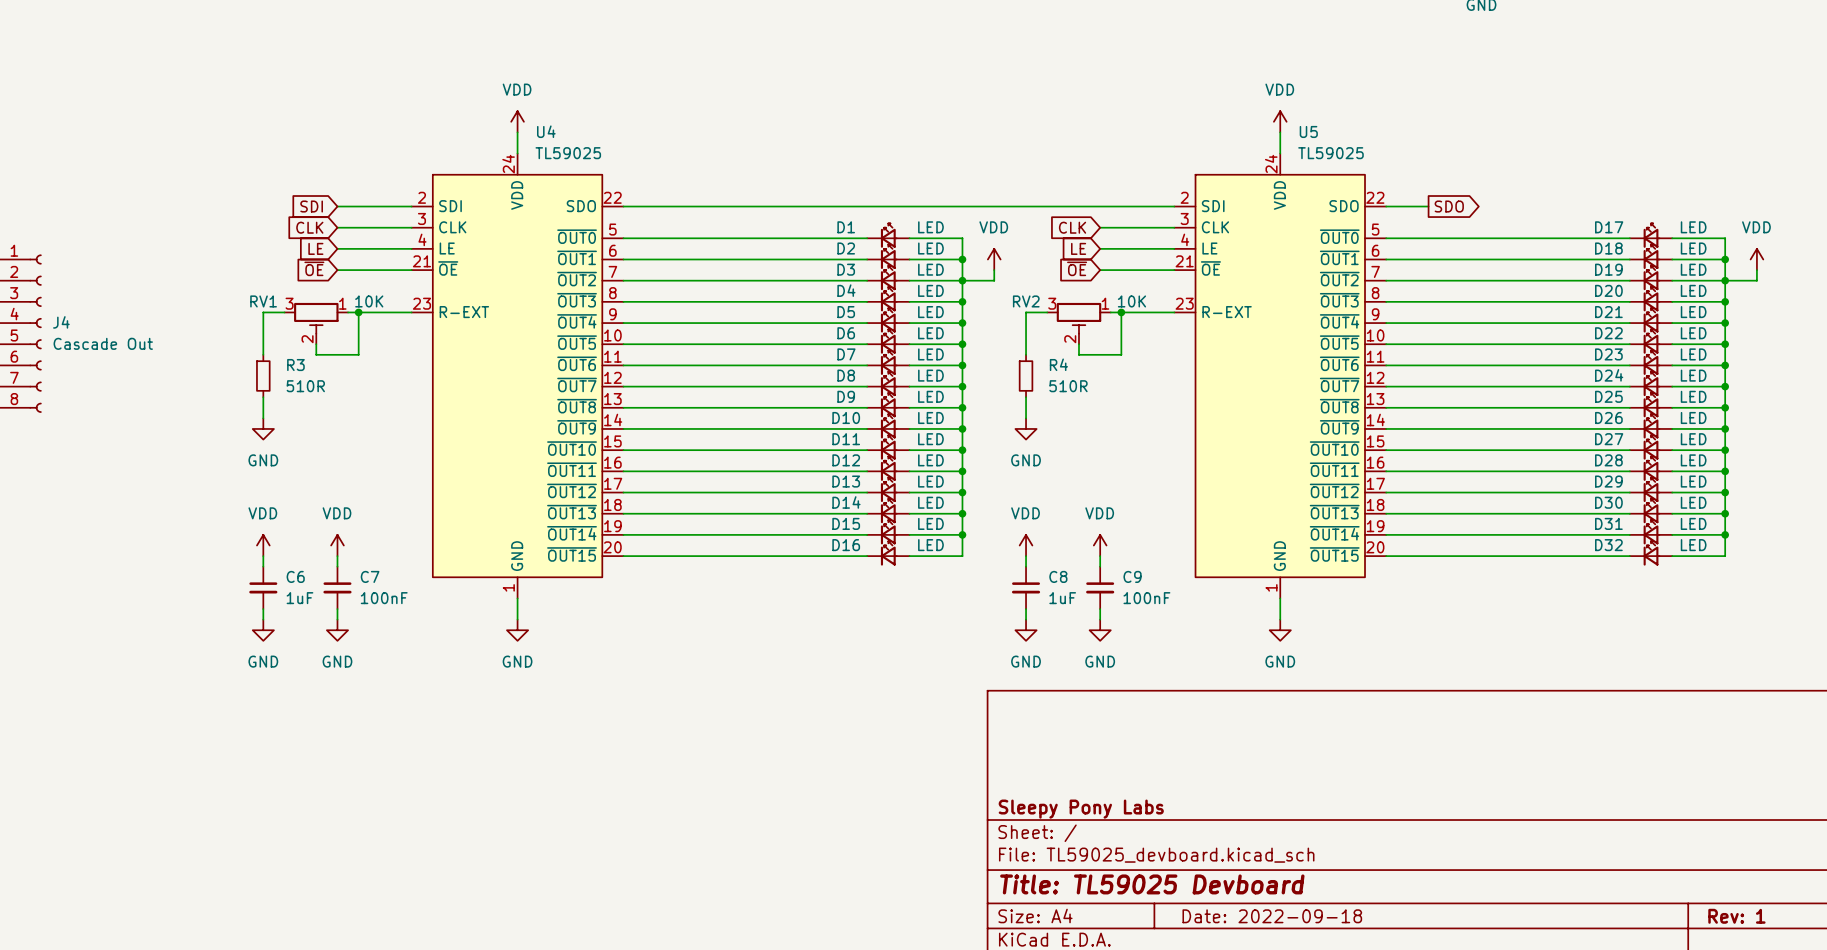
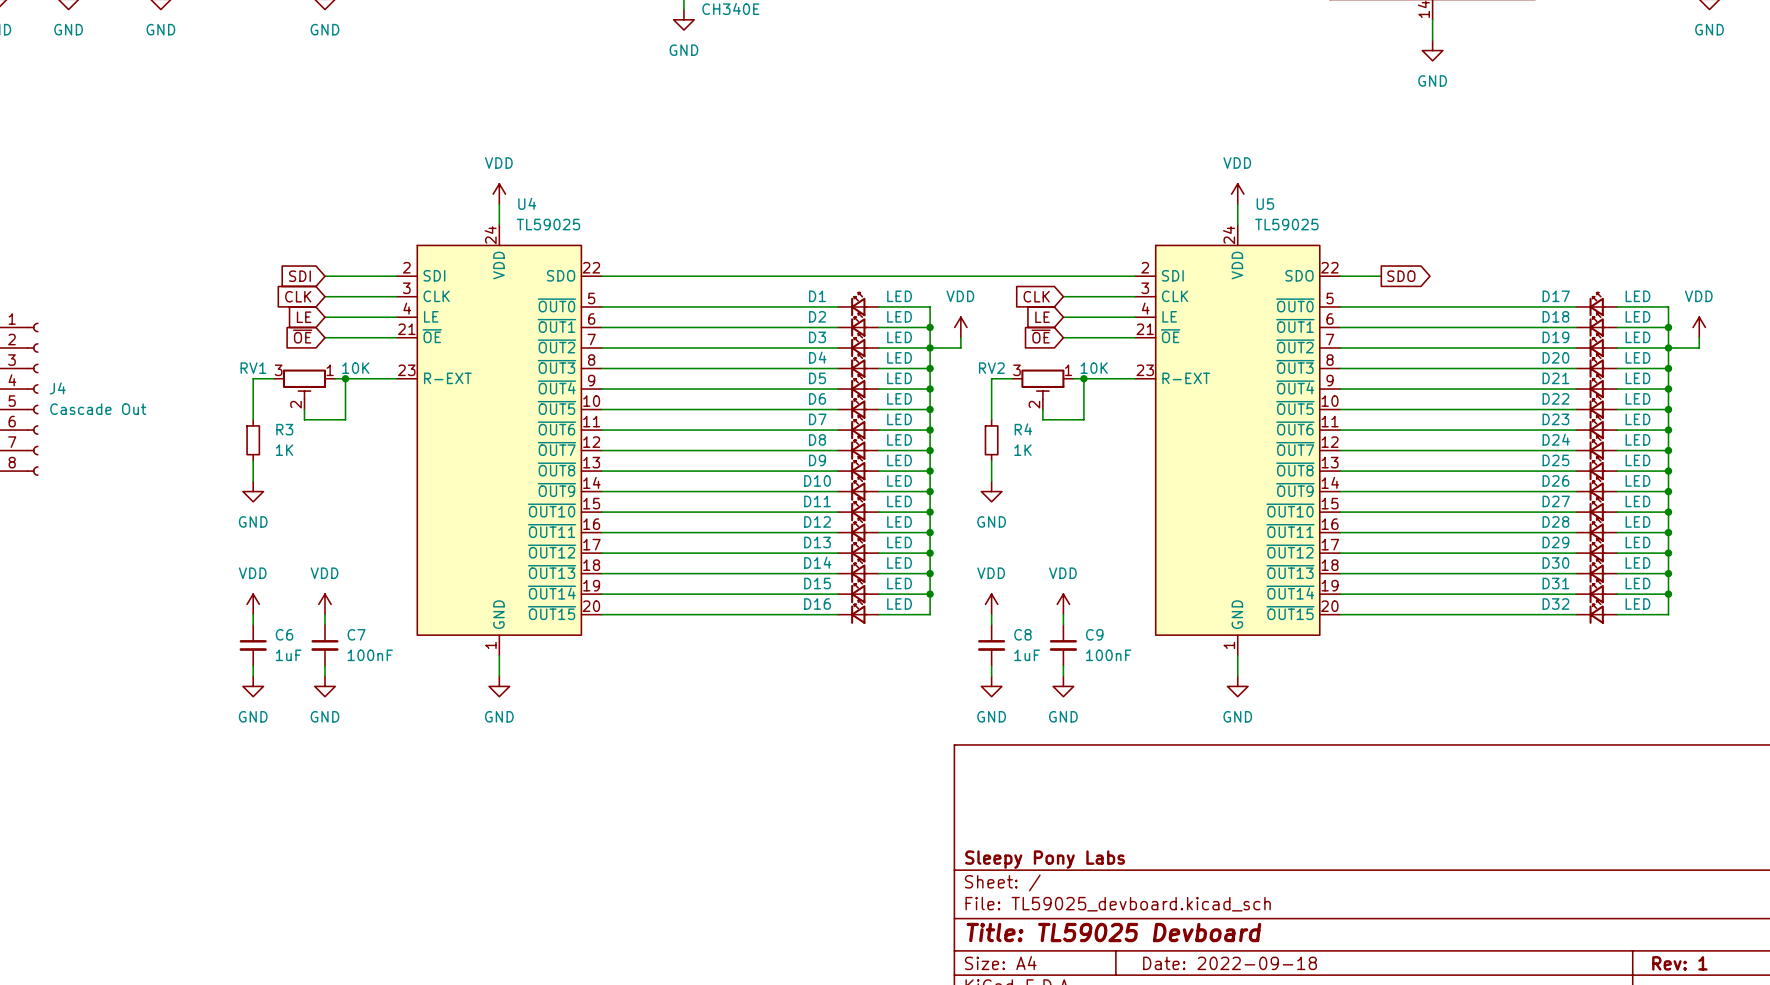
R3 value: 510R (305, 386) -> 1K (284, 450)
R4 value: 510R (1068, 386) -> 1K (1022, 450)

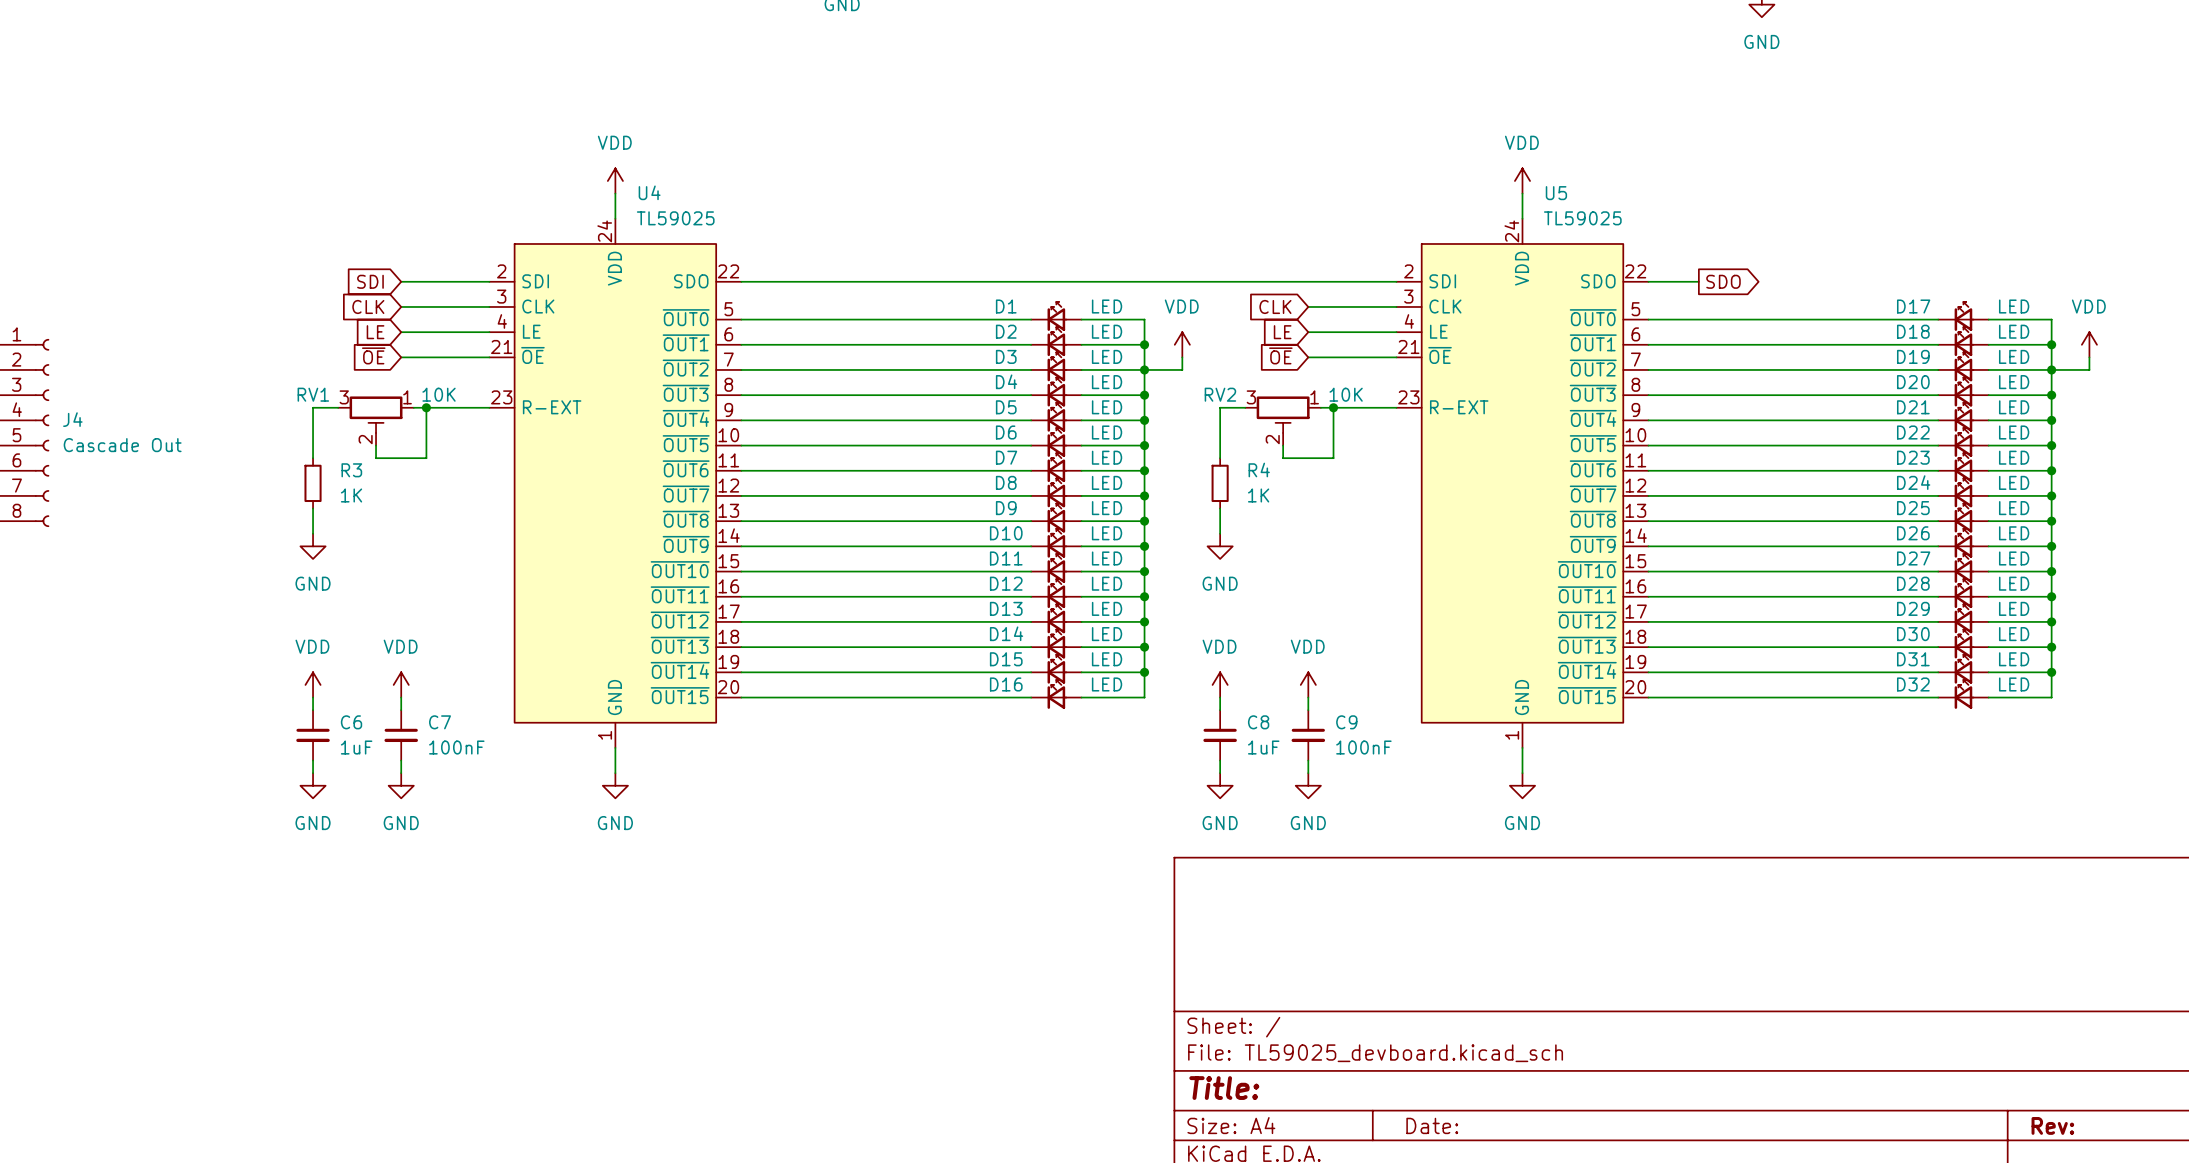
title block: Sleepy Pony Labs (1045, 859) -> none
title block: Title: TL59025 Devboard (1113, 932) -> Title: (1224, 1088)
title block: Date: 2022-09-18 (1230, 963) -> Date: (1432, 1125)
title block: Rev: 1 (1679, 963) -> Rev: (2052, 1125)

